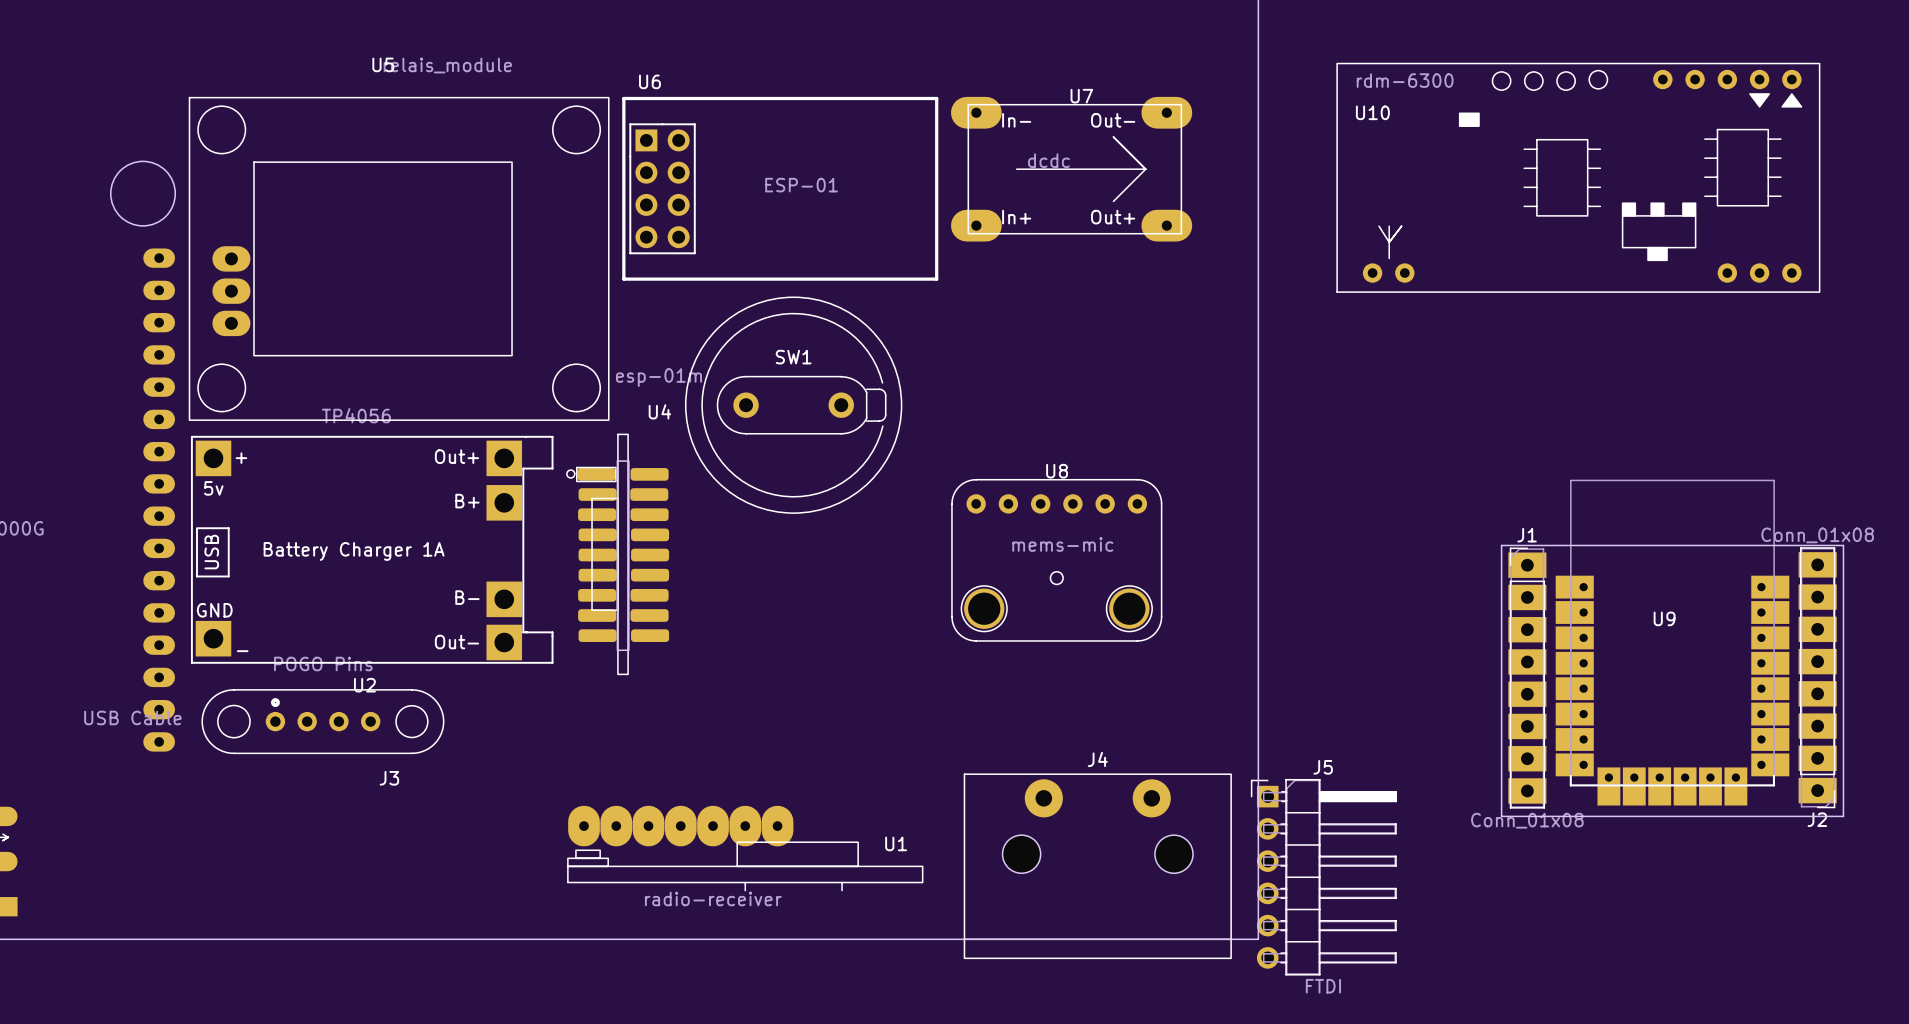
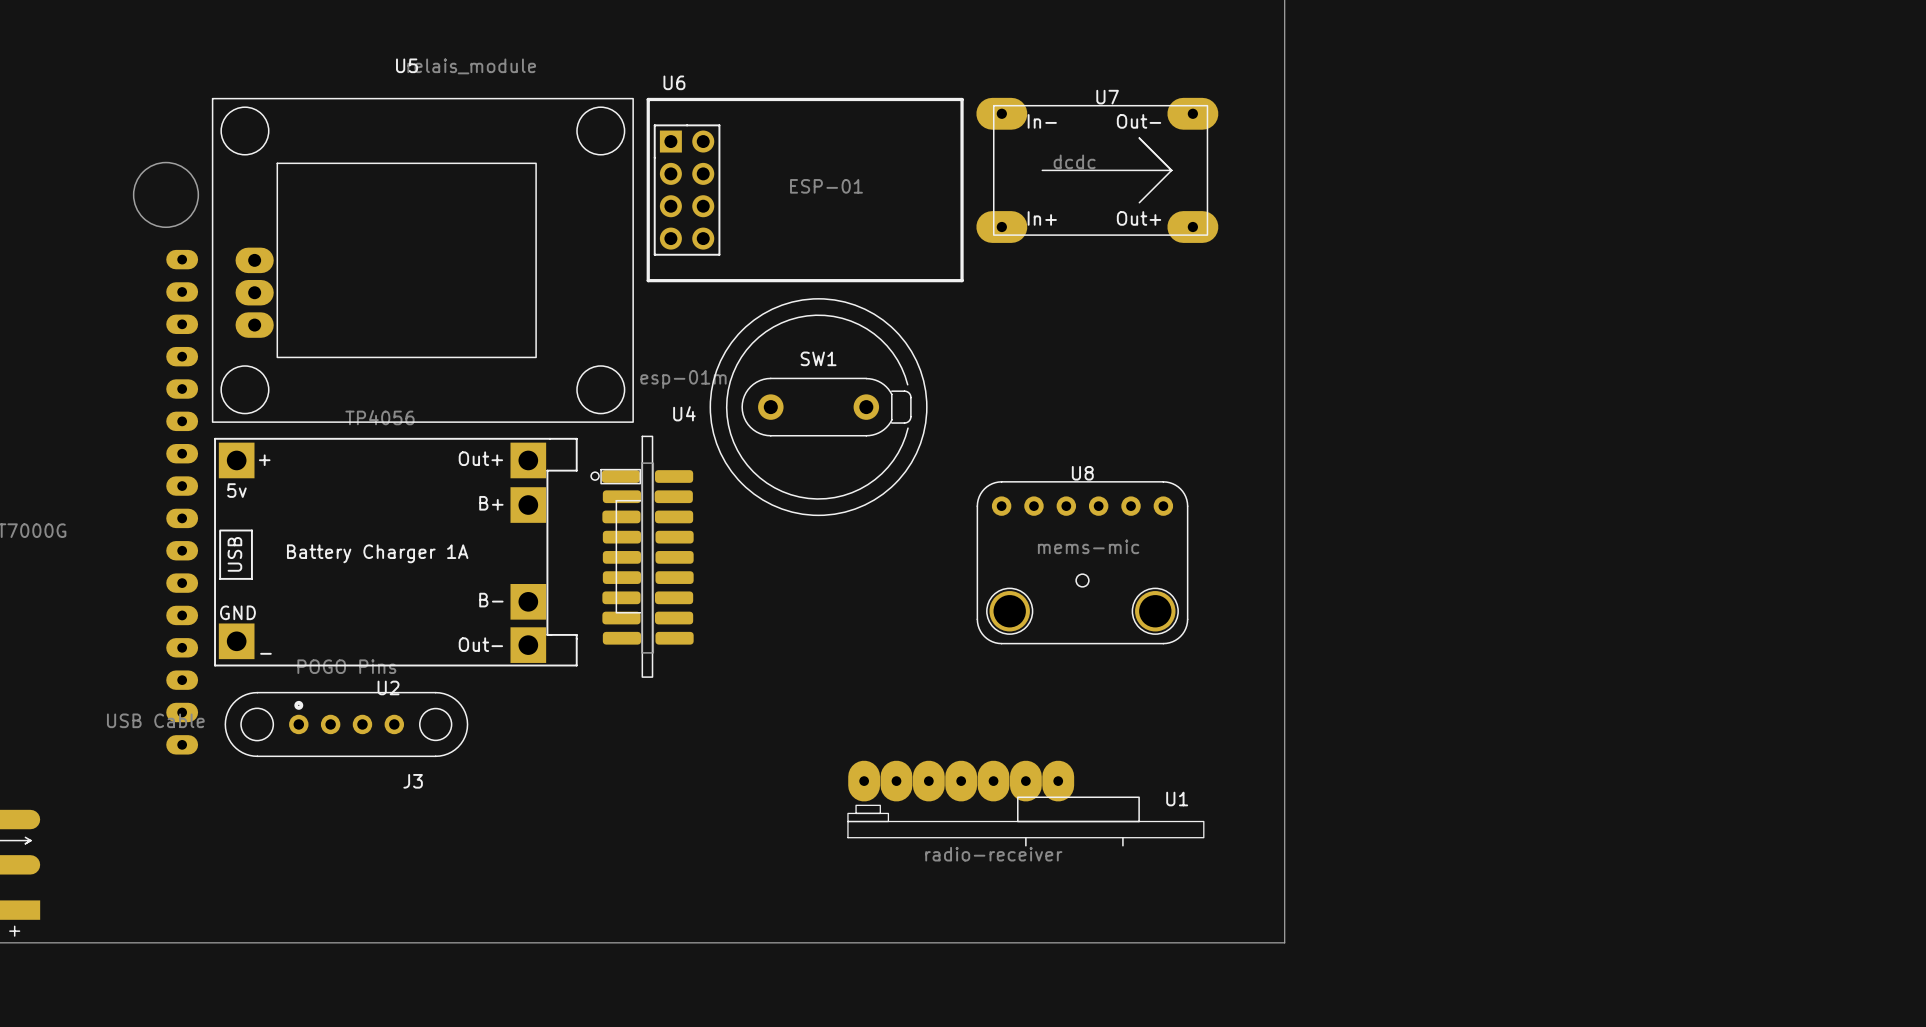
U10: rdm-6300 (1578, 177) -> none
board edge: (1501, 545) (1501, 816) (1843, 816) (1843, 545) (1501, 545) -> none
U9: (1672, 642) -> none
J2: Conn_01x08 (1817, 677) -> none
J1: Conn_01x08 (1527, 678) -> none
U1 position: (745, 848) -> (1025, 803)
J4: (1097, 866) -> none
J5: FTDI (1323, 877) -> none

